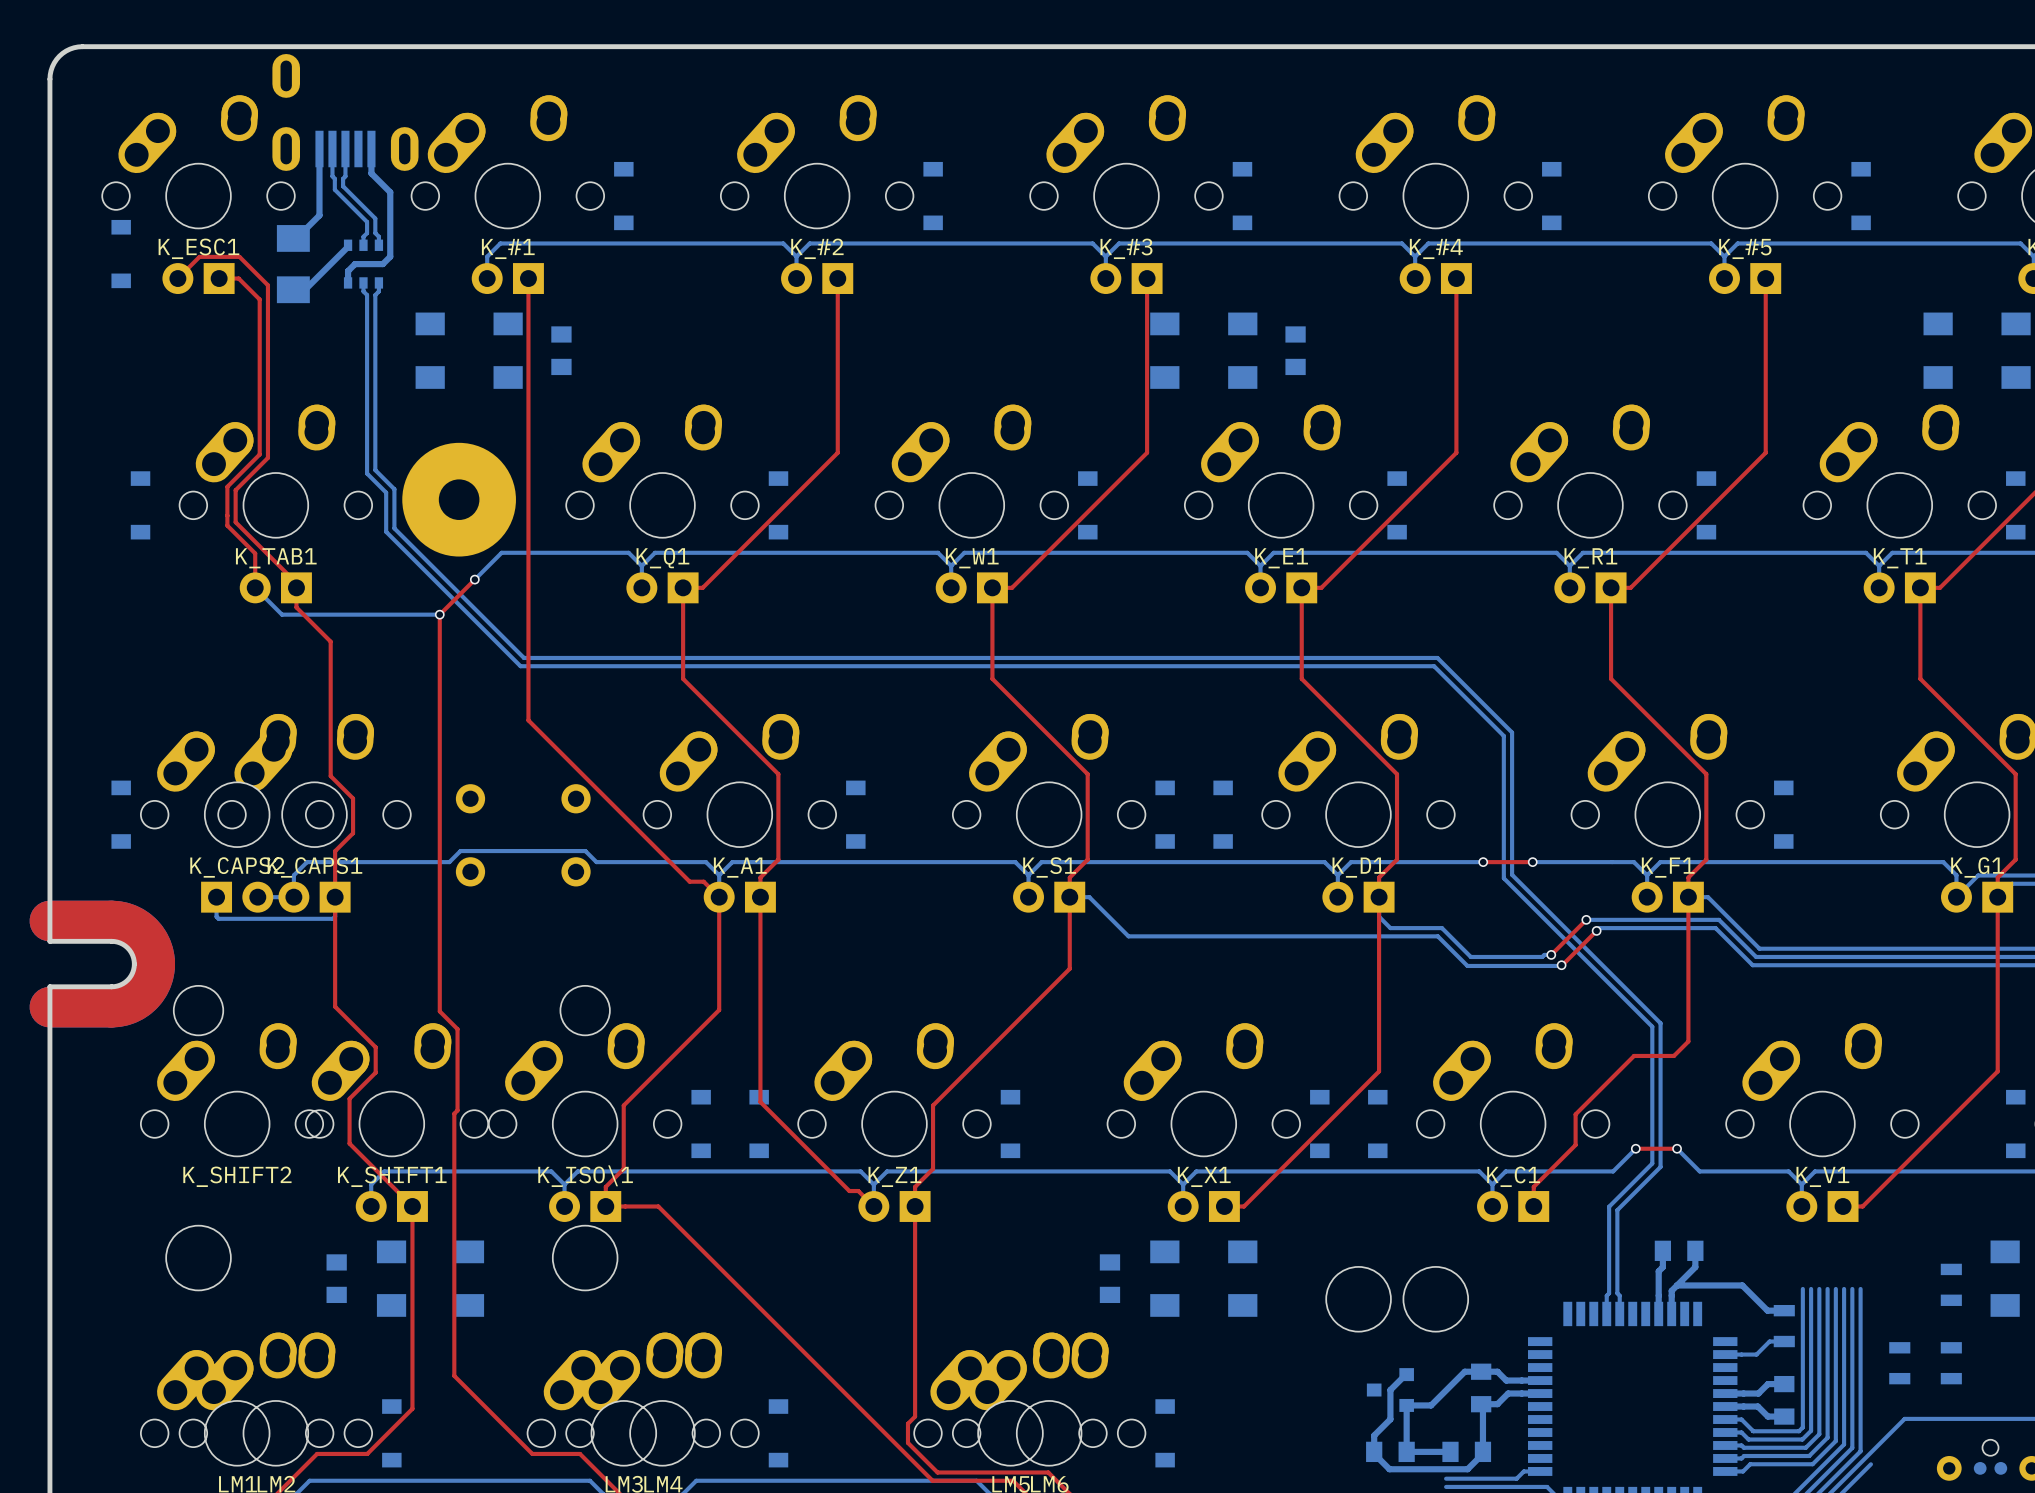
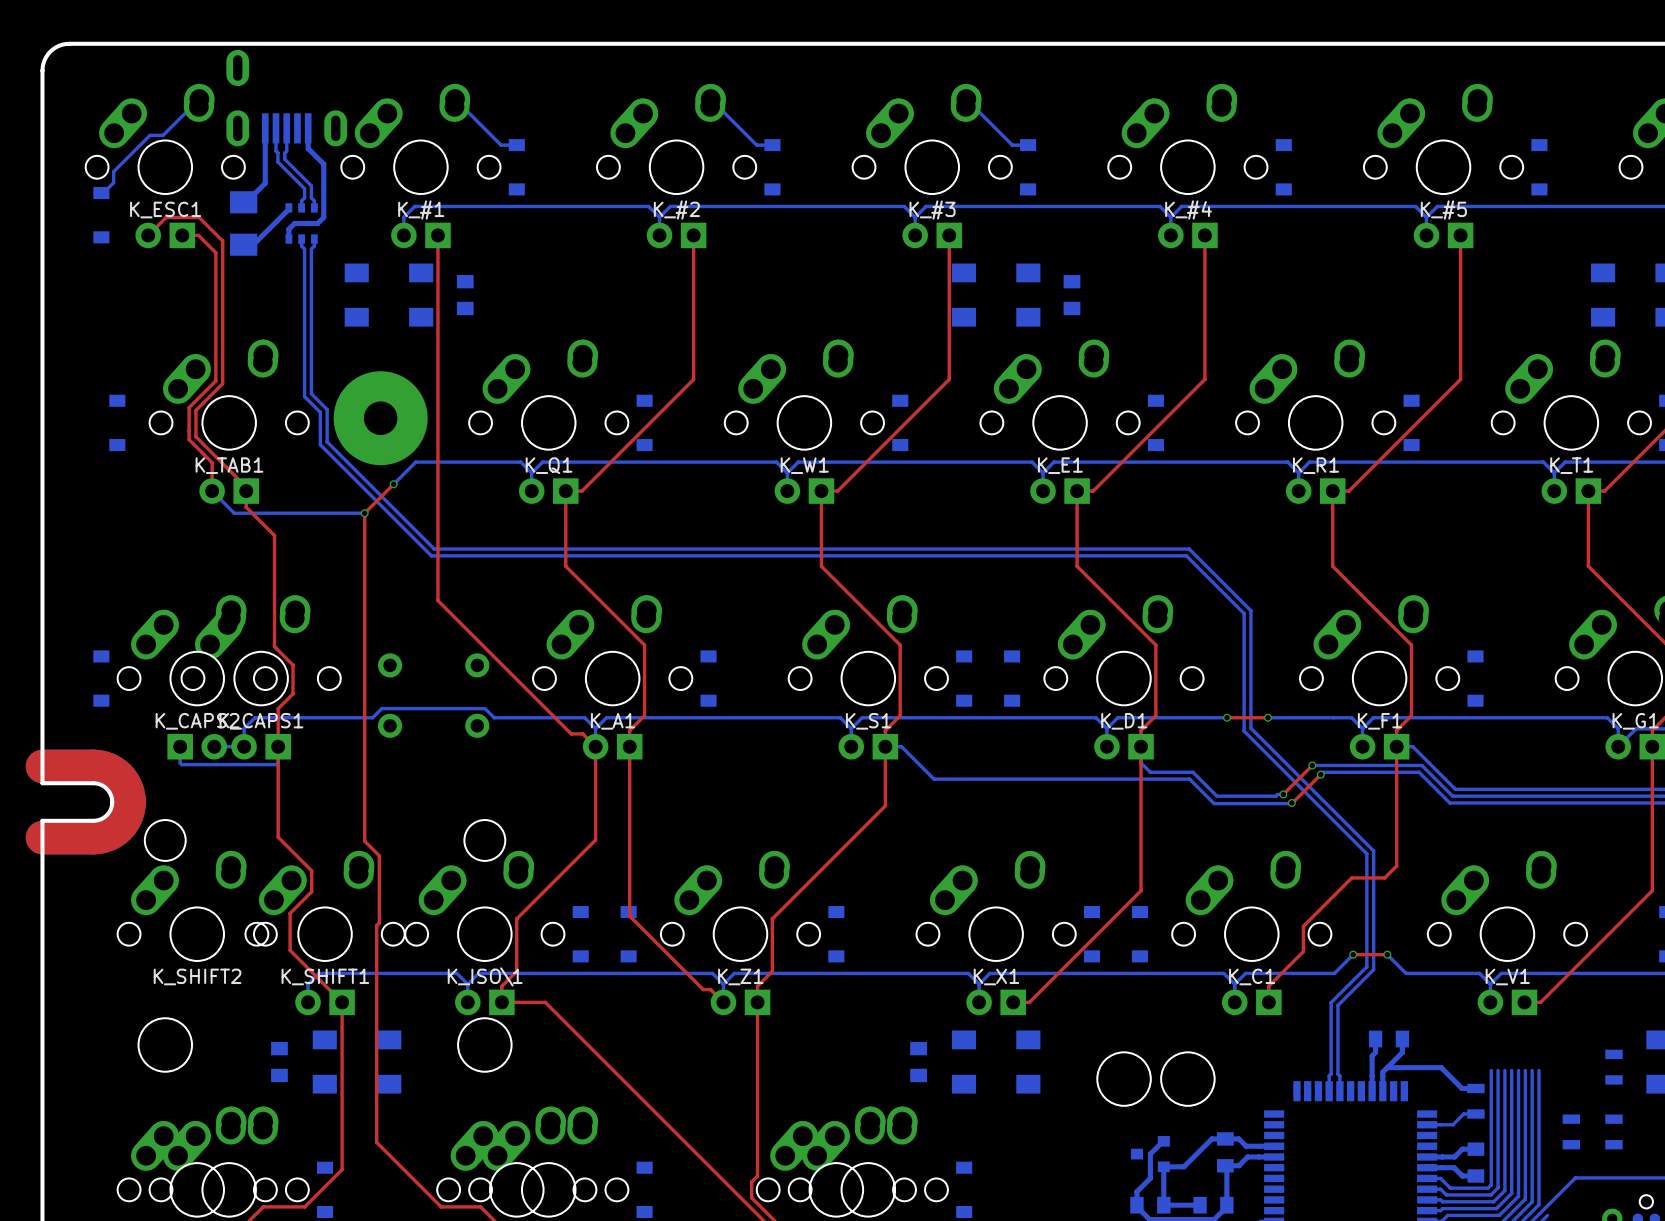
bottom track: none -> (199, 99) (163, 135) (149, 135) (113, 171) (113, 182) (101, 193)
bottom track: none -> (455, 99) (501, 145) (516, 145)
bottom track: none -> (710, 99) (756, 145) (772, 145)
bottom track: none -> (966, 99) (1012, 145) (1028, 145)

